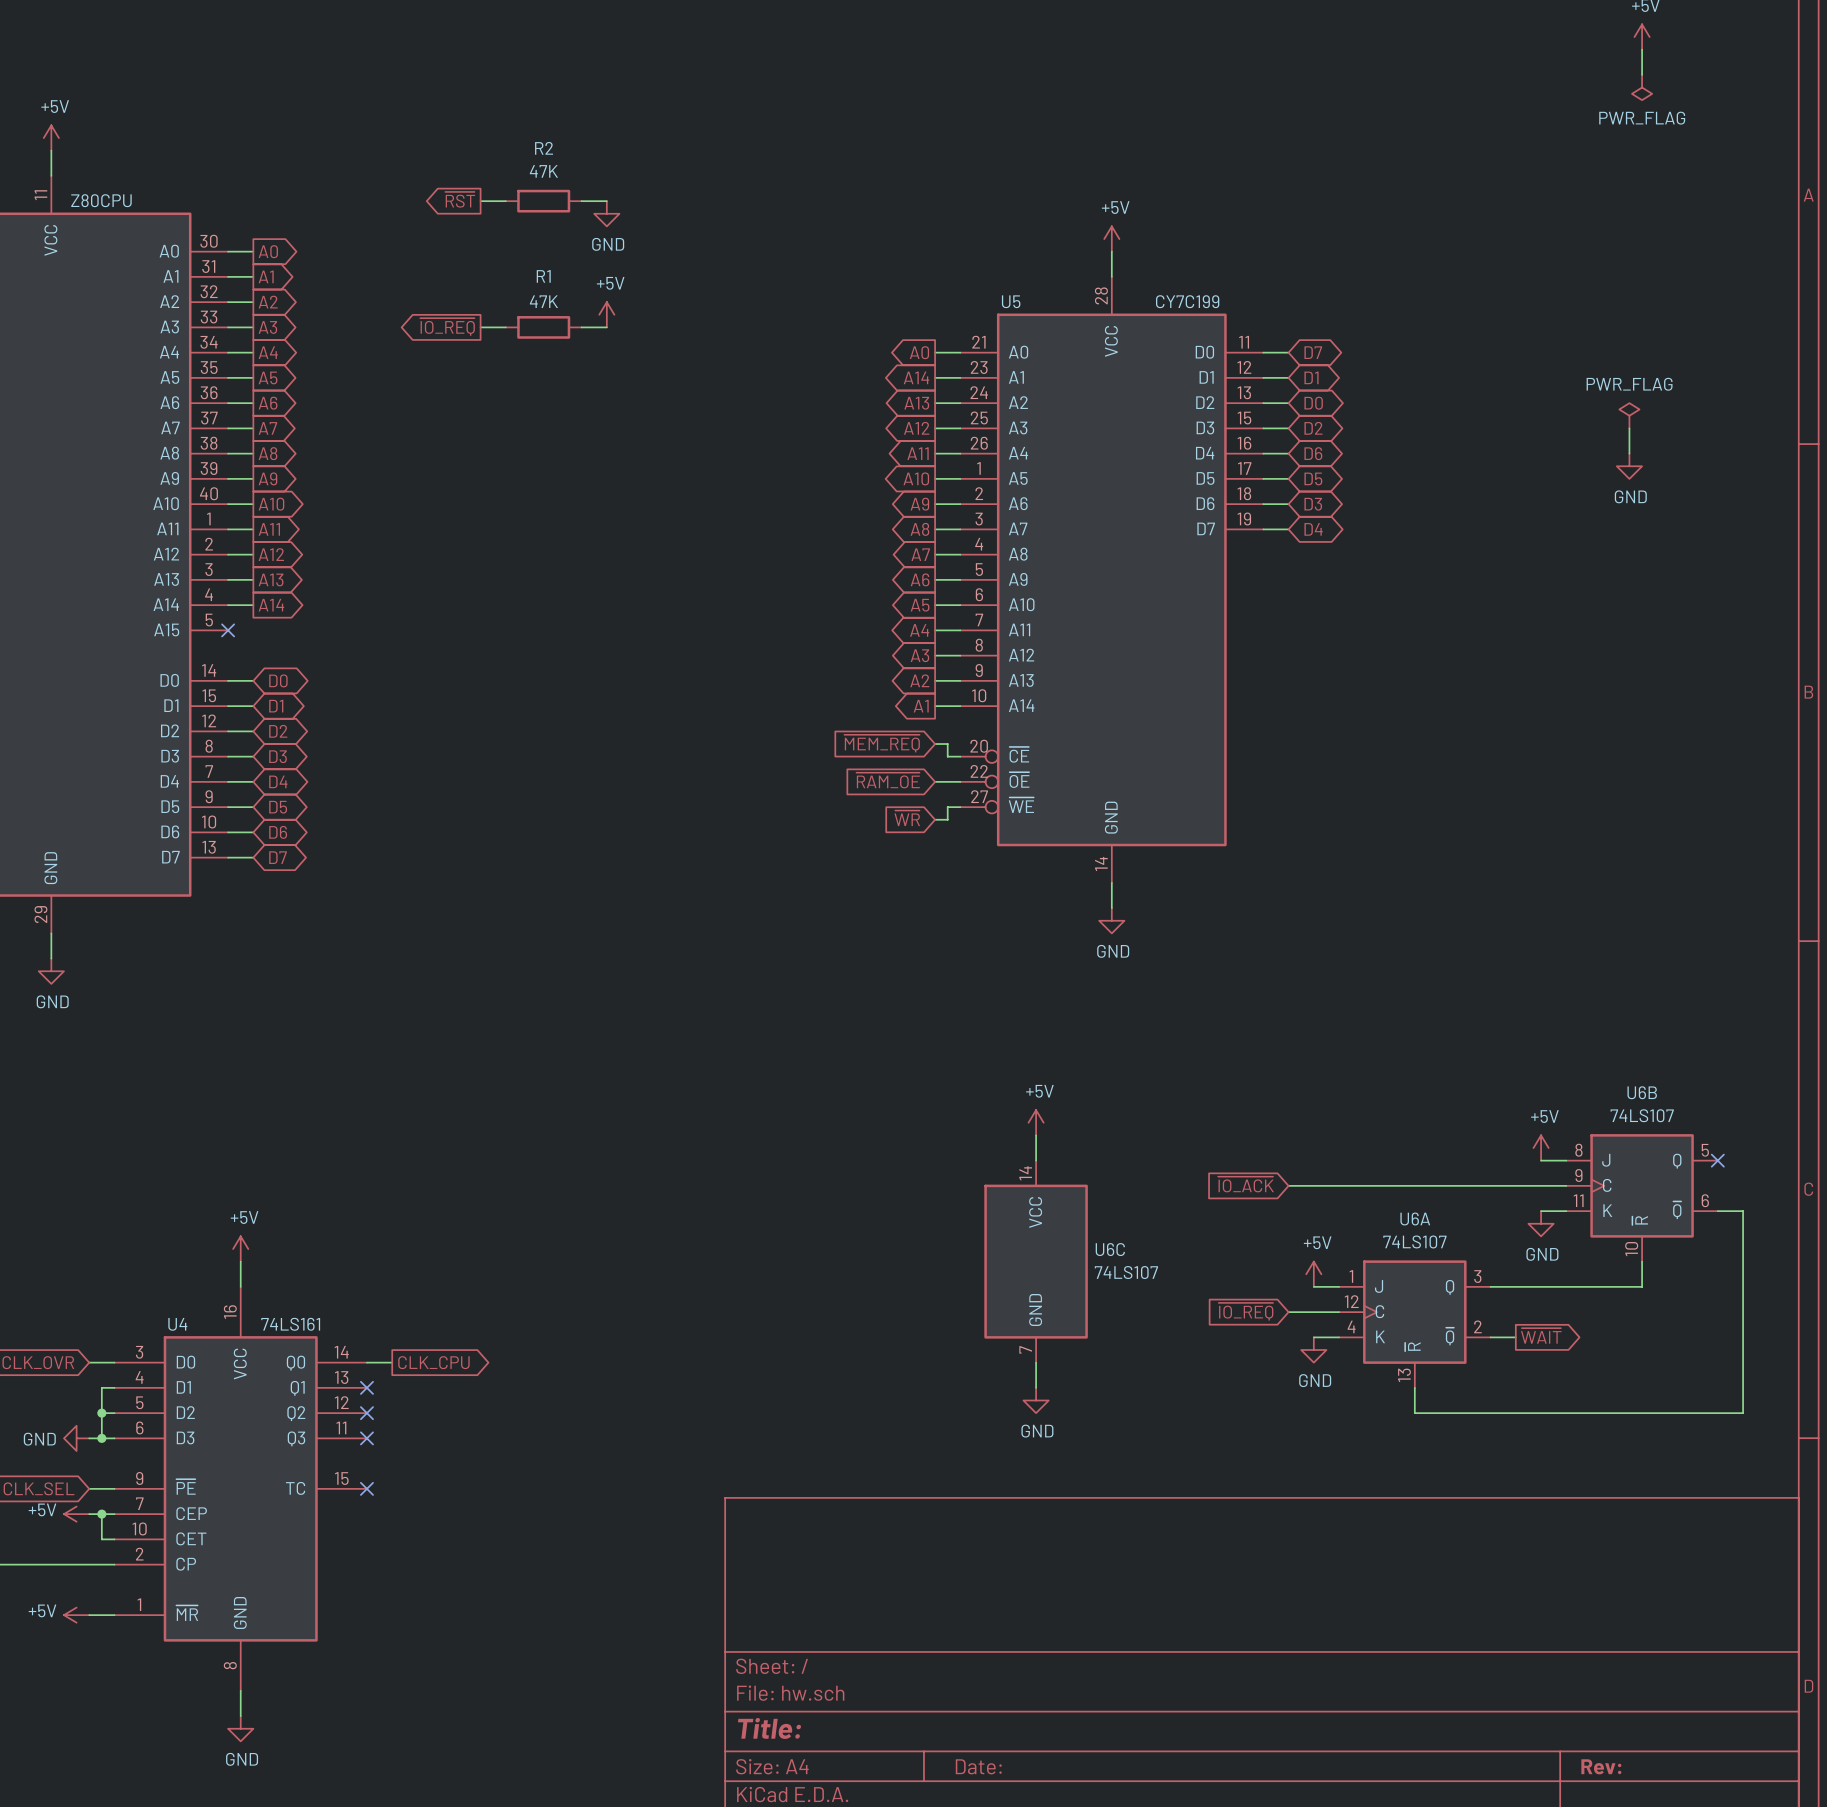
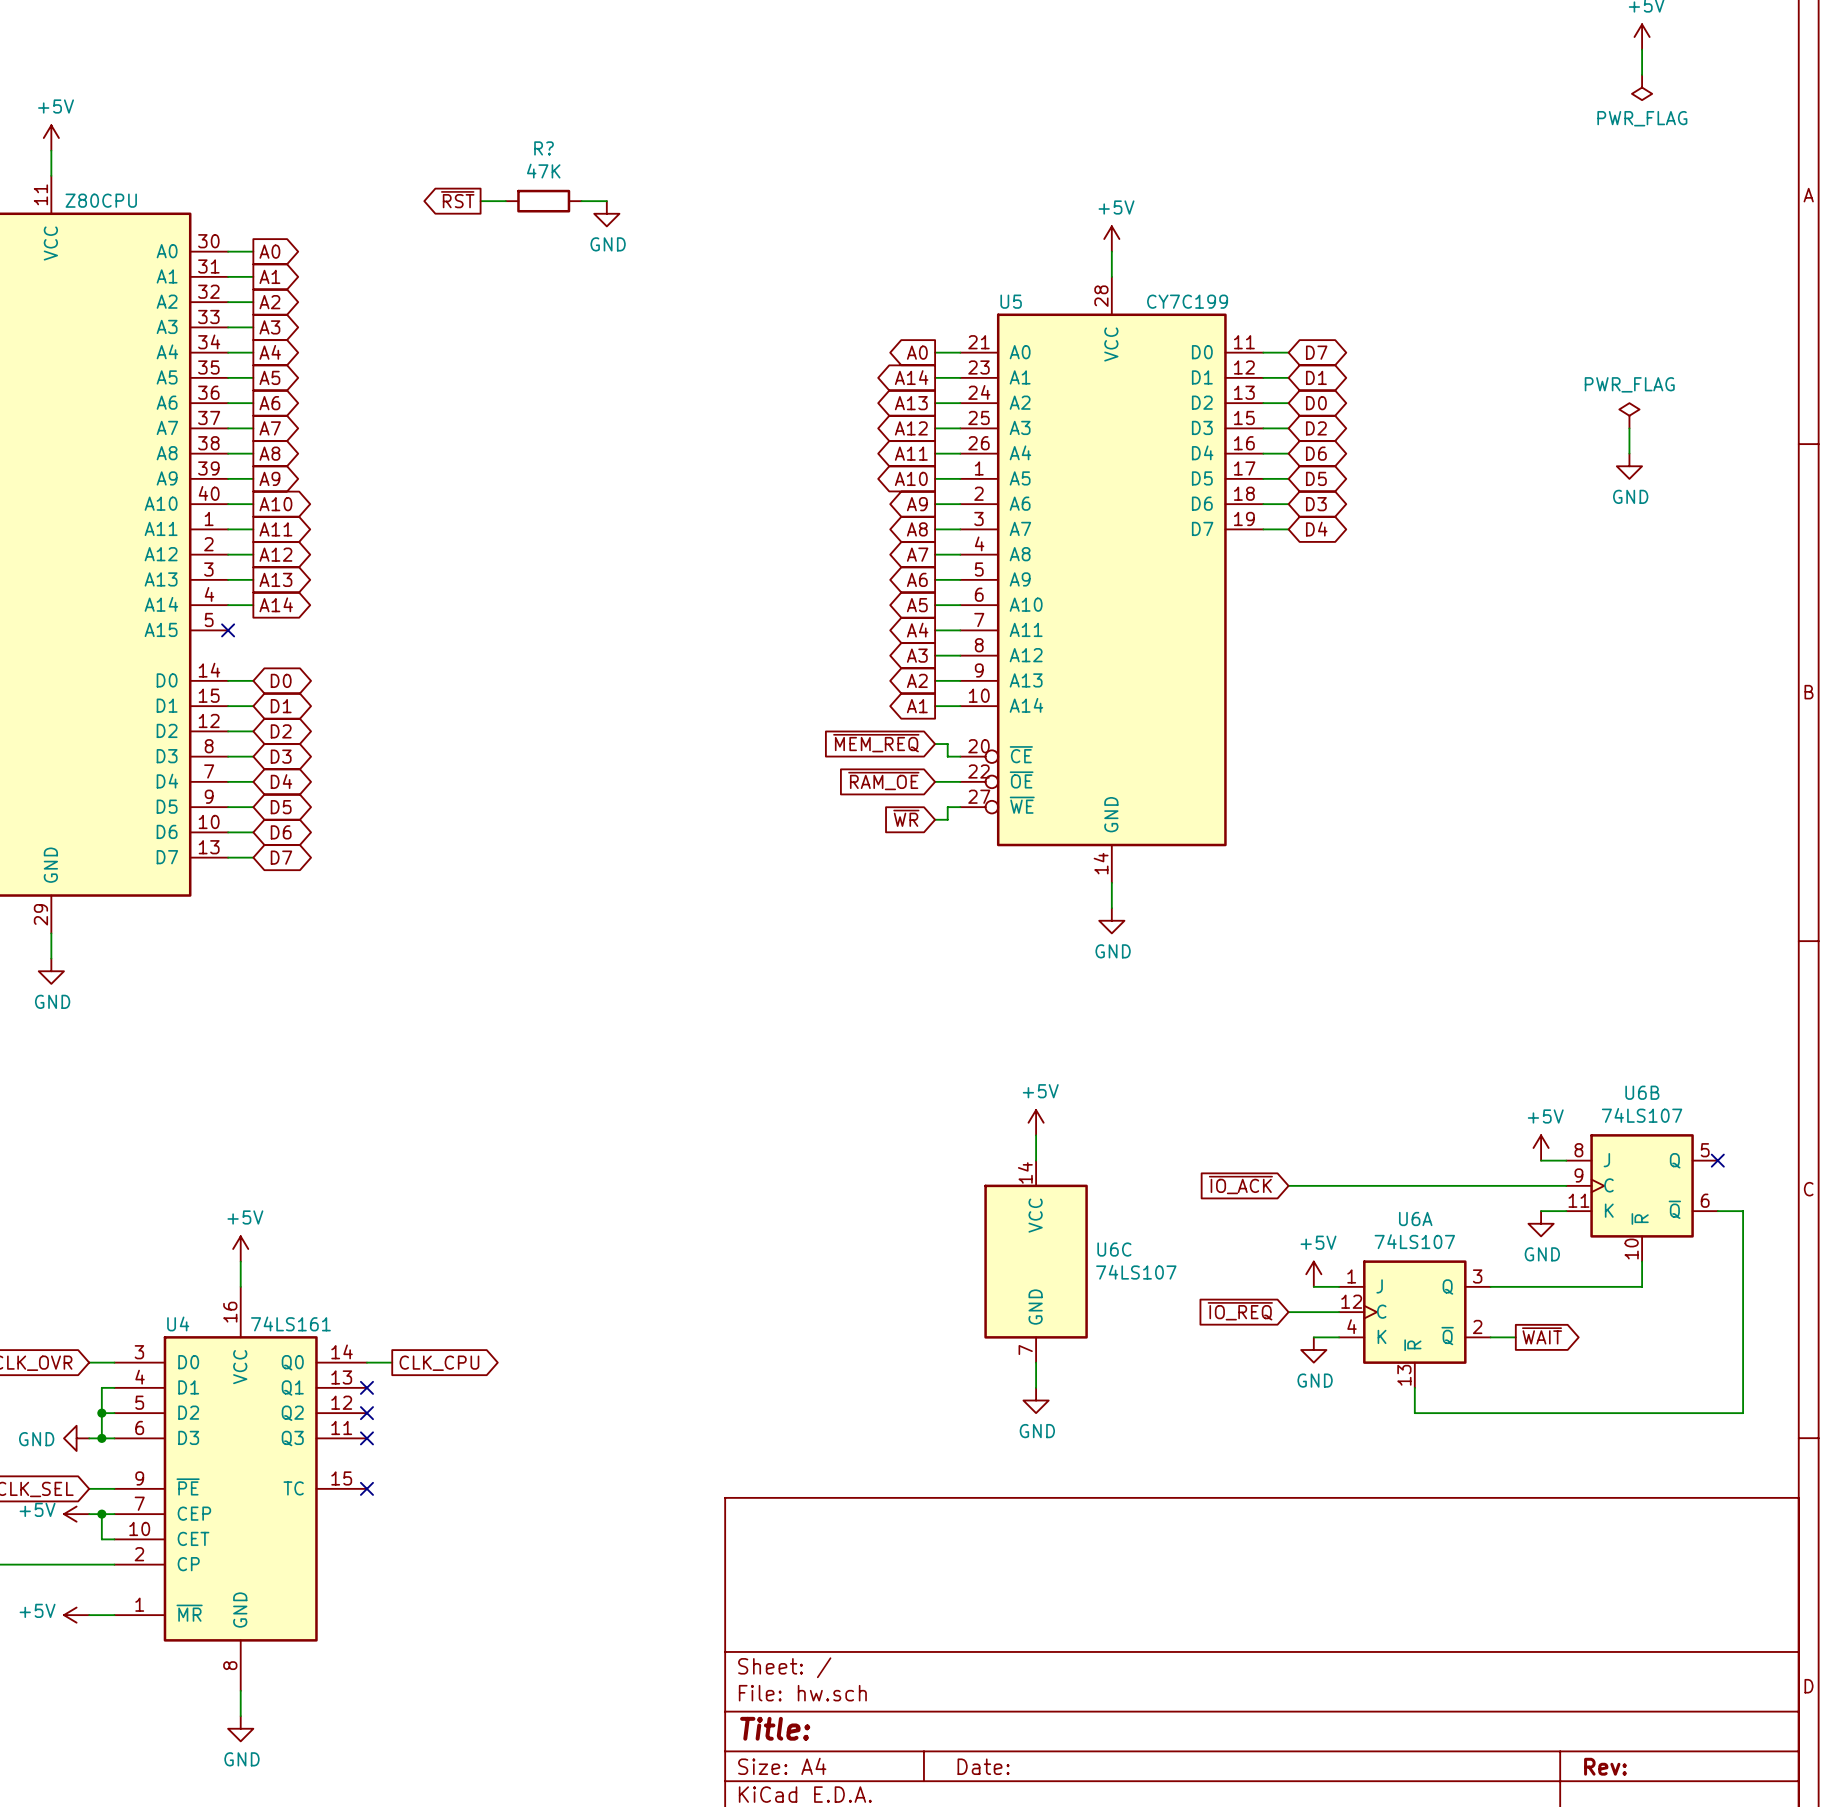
R2 name: R2 (544, 148) -> R? (544, 148)
power symbol: +5V (606, 314) -> none
global label: ~{IO_REQ} (447, 326) -> none
wire: (480, 327) (505, 327) -> none
R1: 47K (543, 327) -> none
wire: (581, 327) (606, 327) -> none

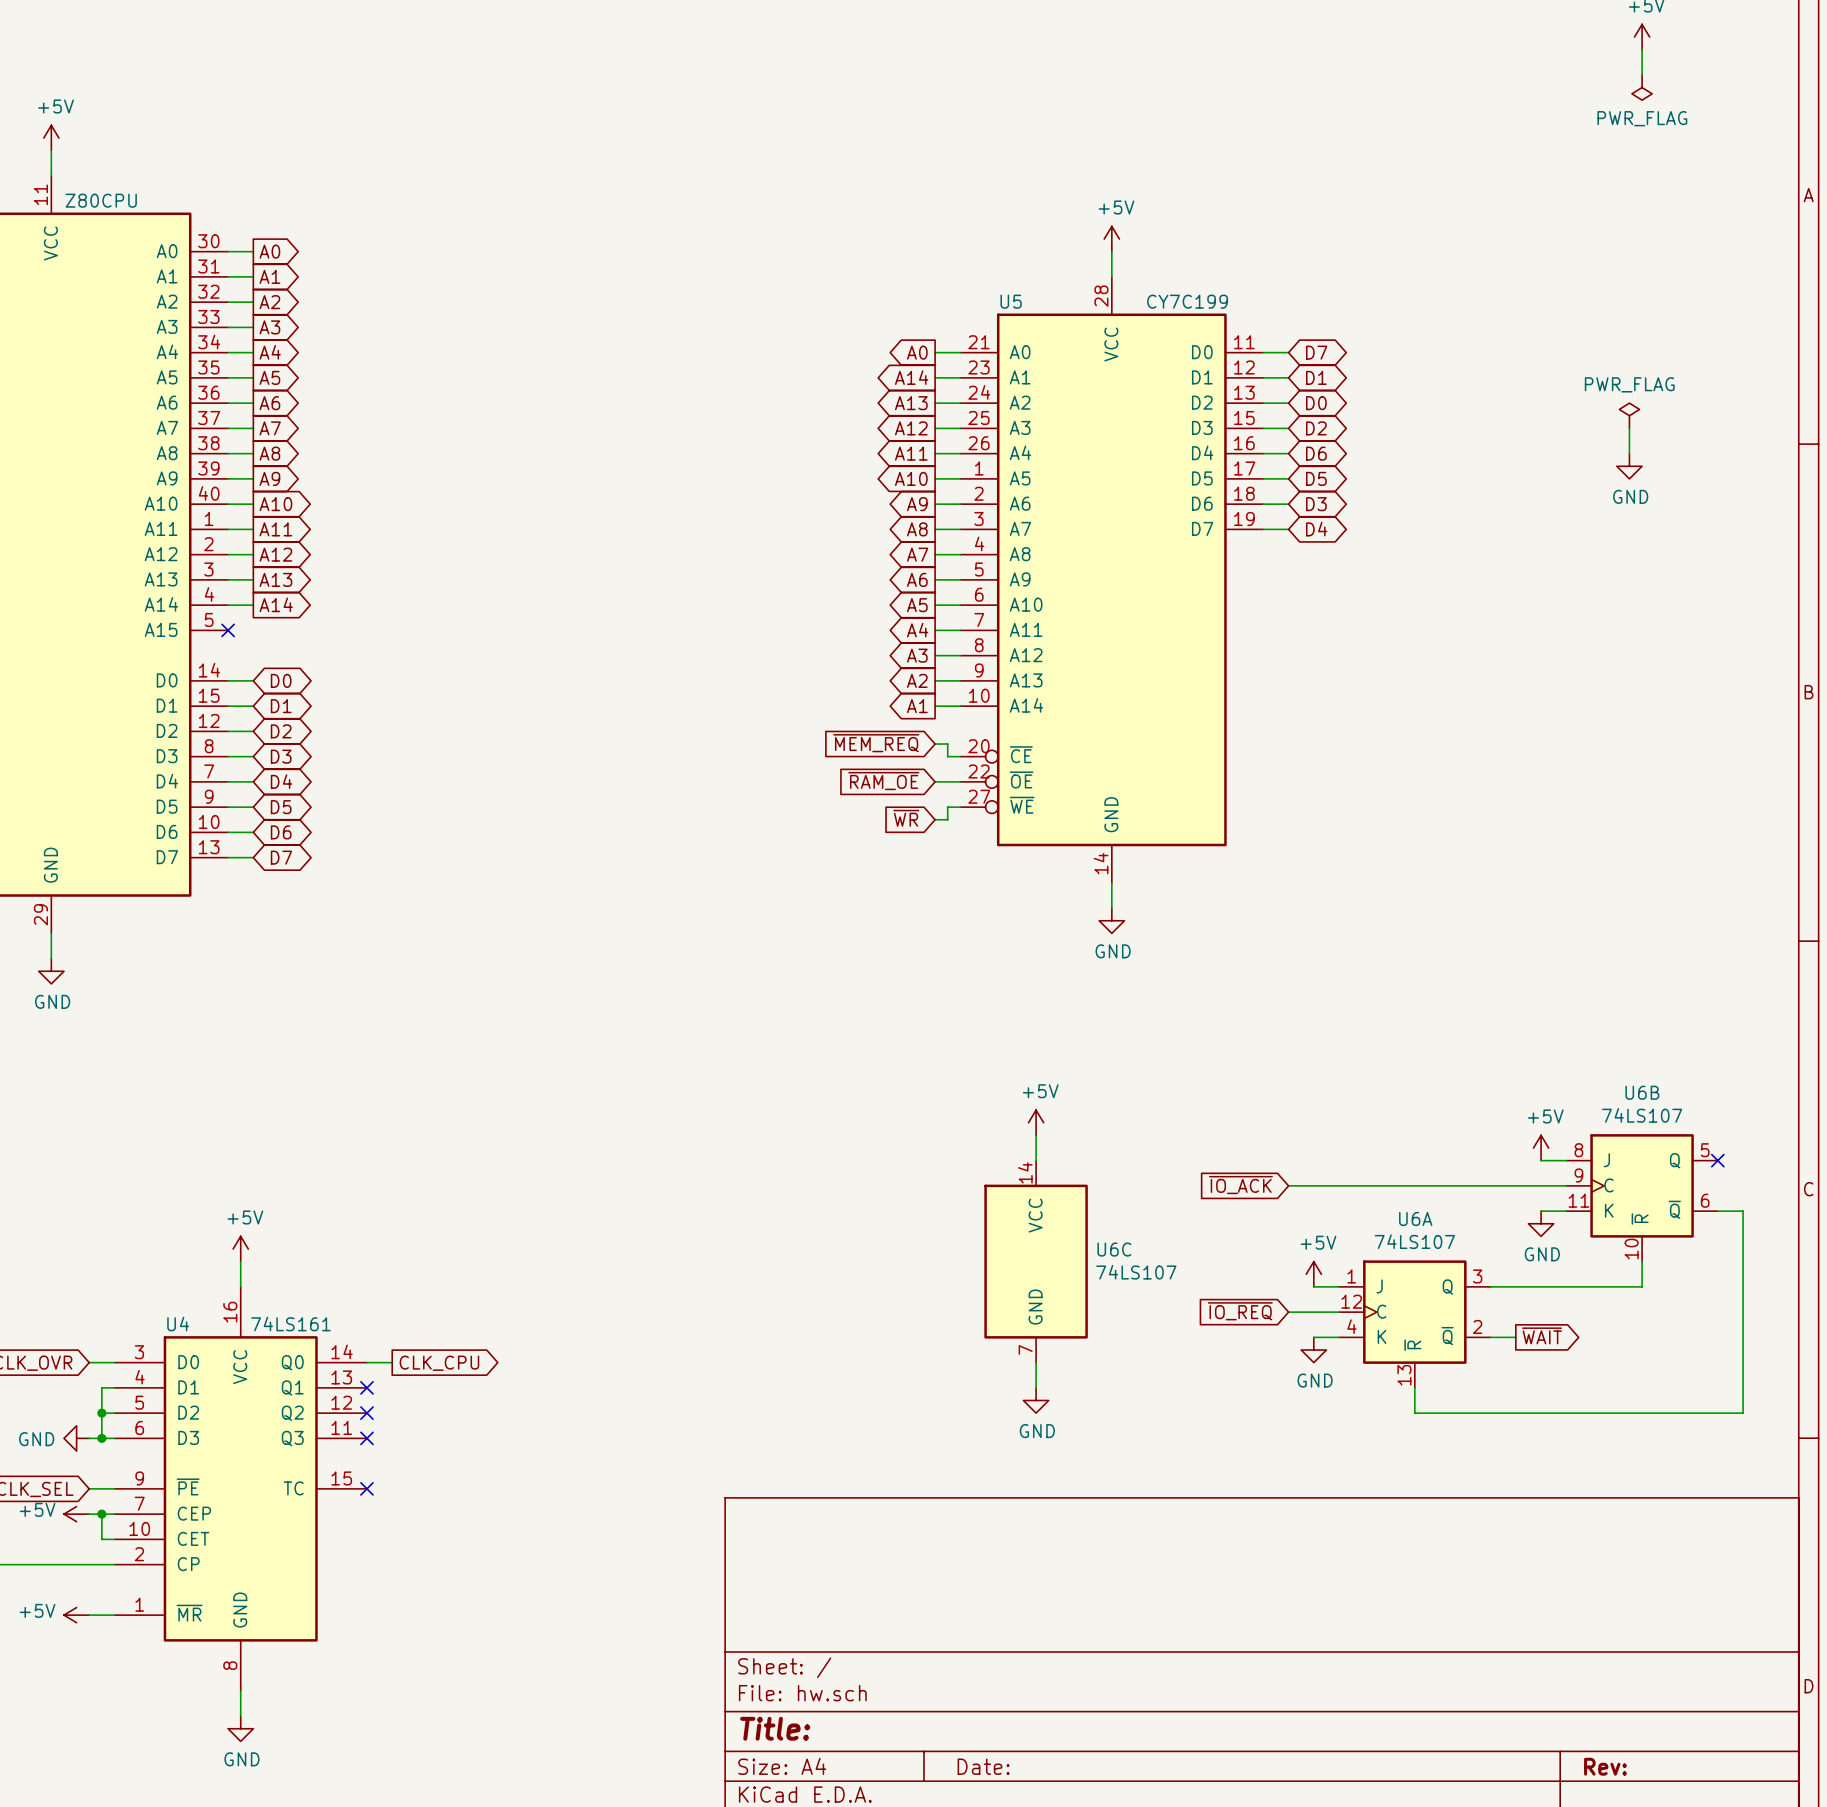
global label: ~{RST} (457, 199) -> none
wire: (480, 201) (505, 201) -> none
R?: 47K (543, 201) -> none
wire: (581, 201) (606, 201) -> none
power symbol: GND (606, 213) -> none

